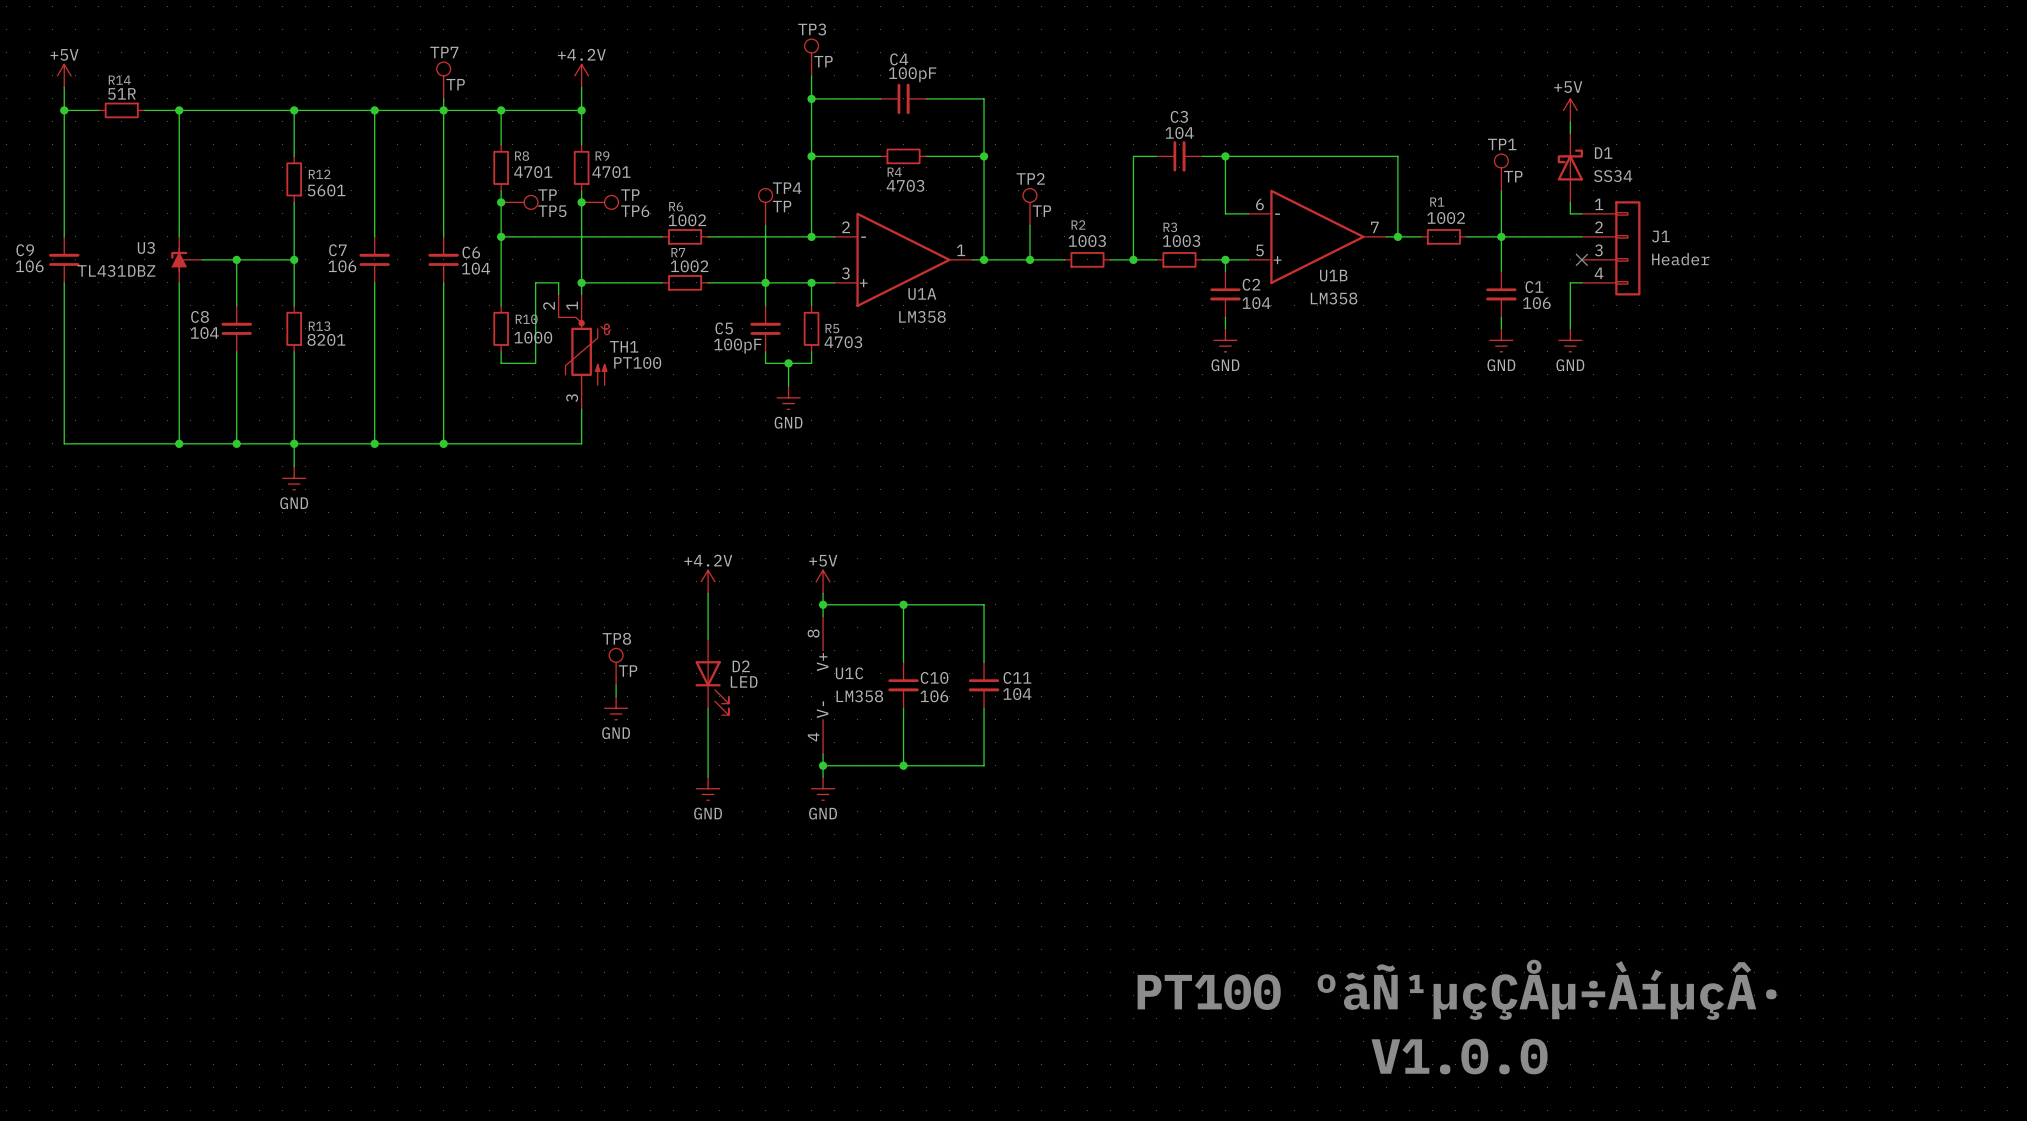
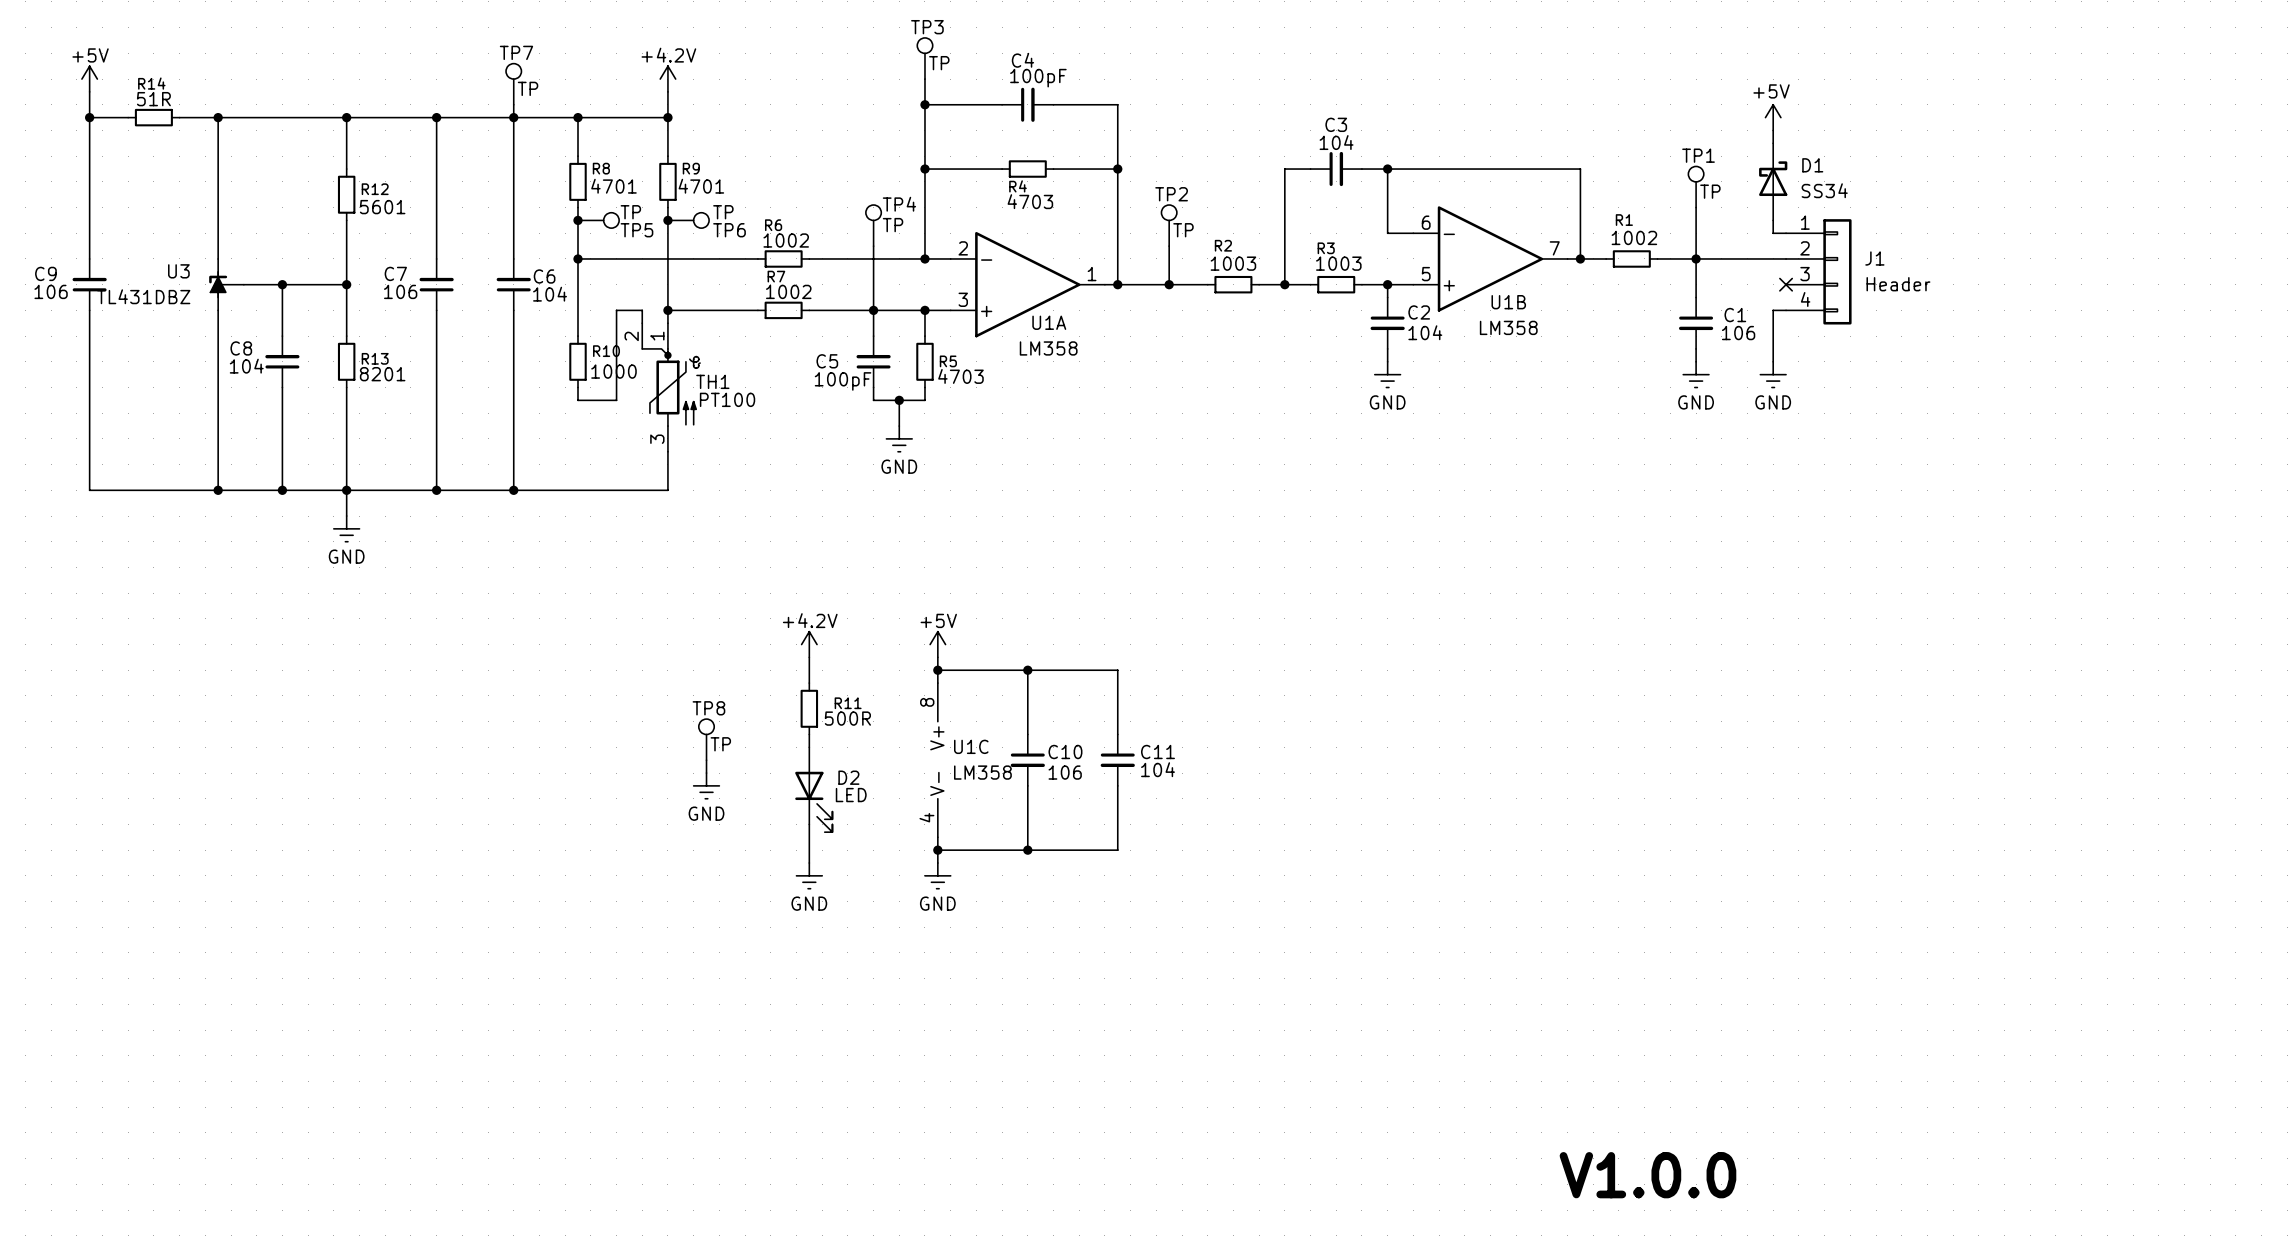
wire: (708, 616) (708, 639) -> none
R11: none -> 500R (809, 708)
D2 position: (712, 677) -> (813, 789)
text: PT100 ºãÑ¹µçÇÅµ÷ÀíµçÂ· (1457, 989) -> none

